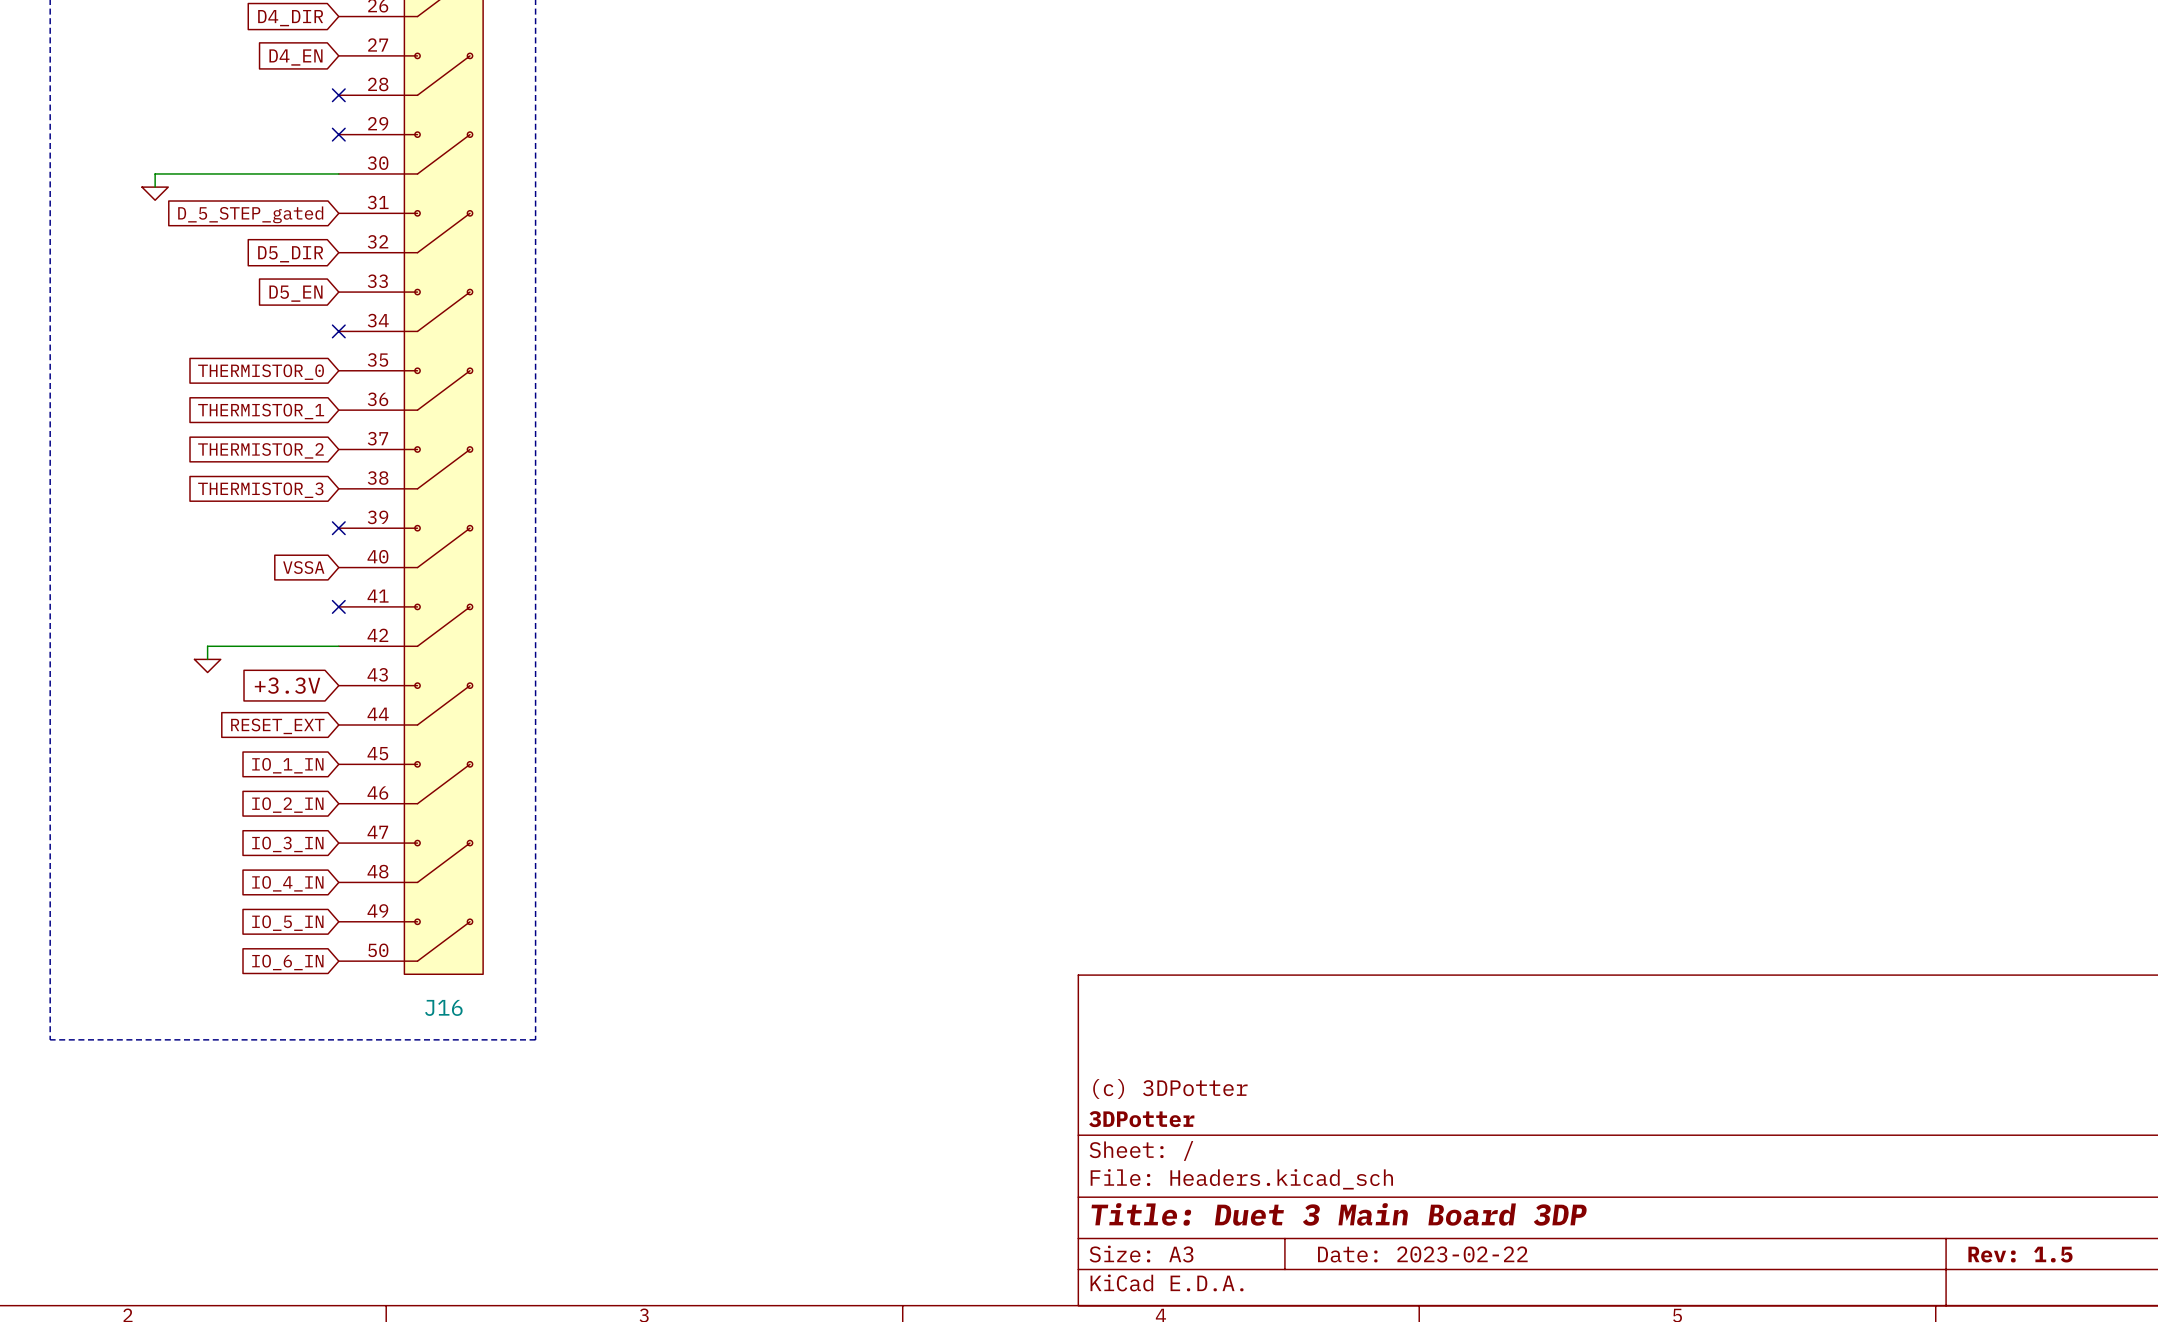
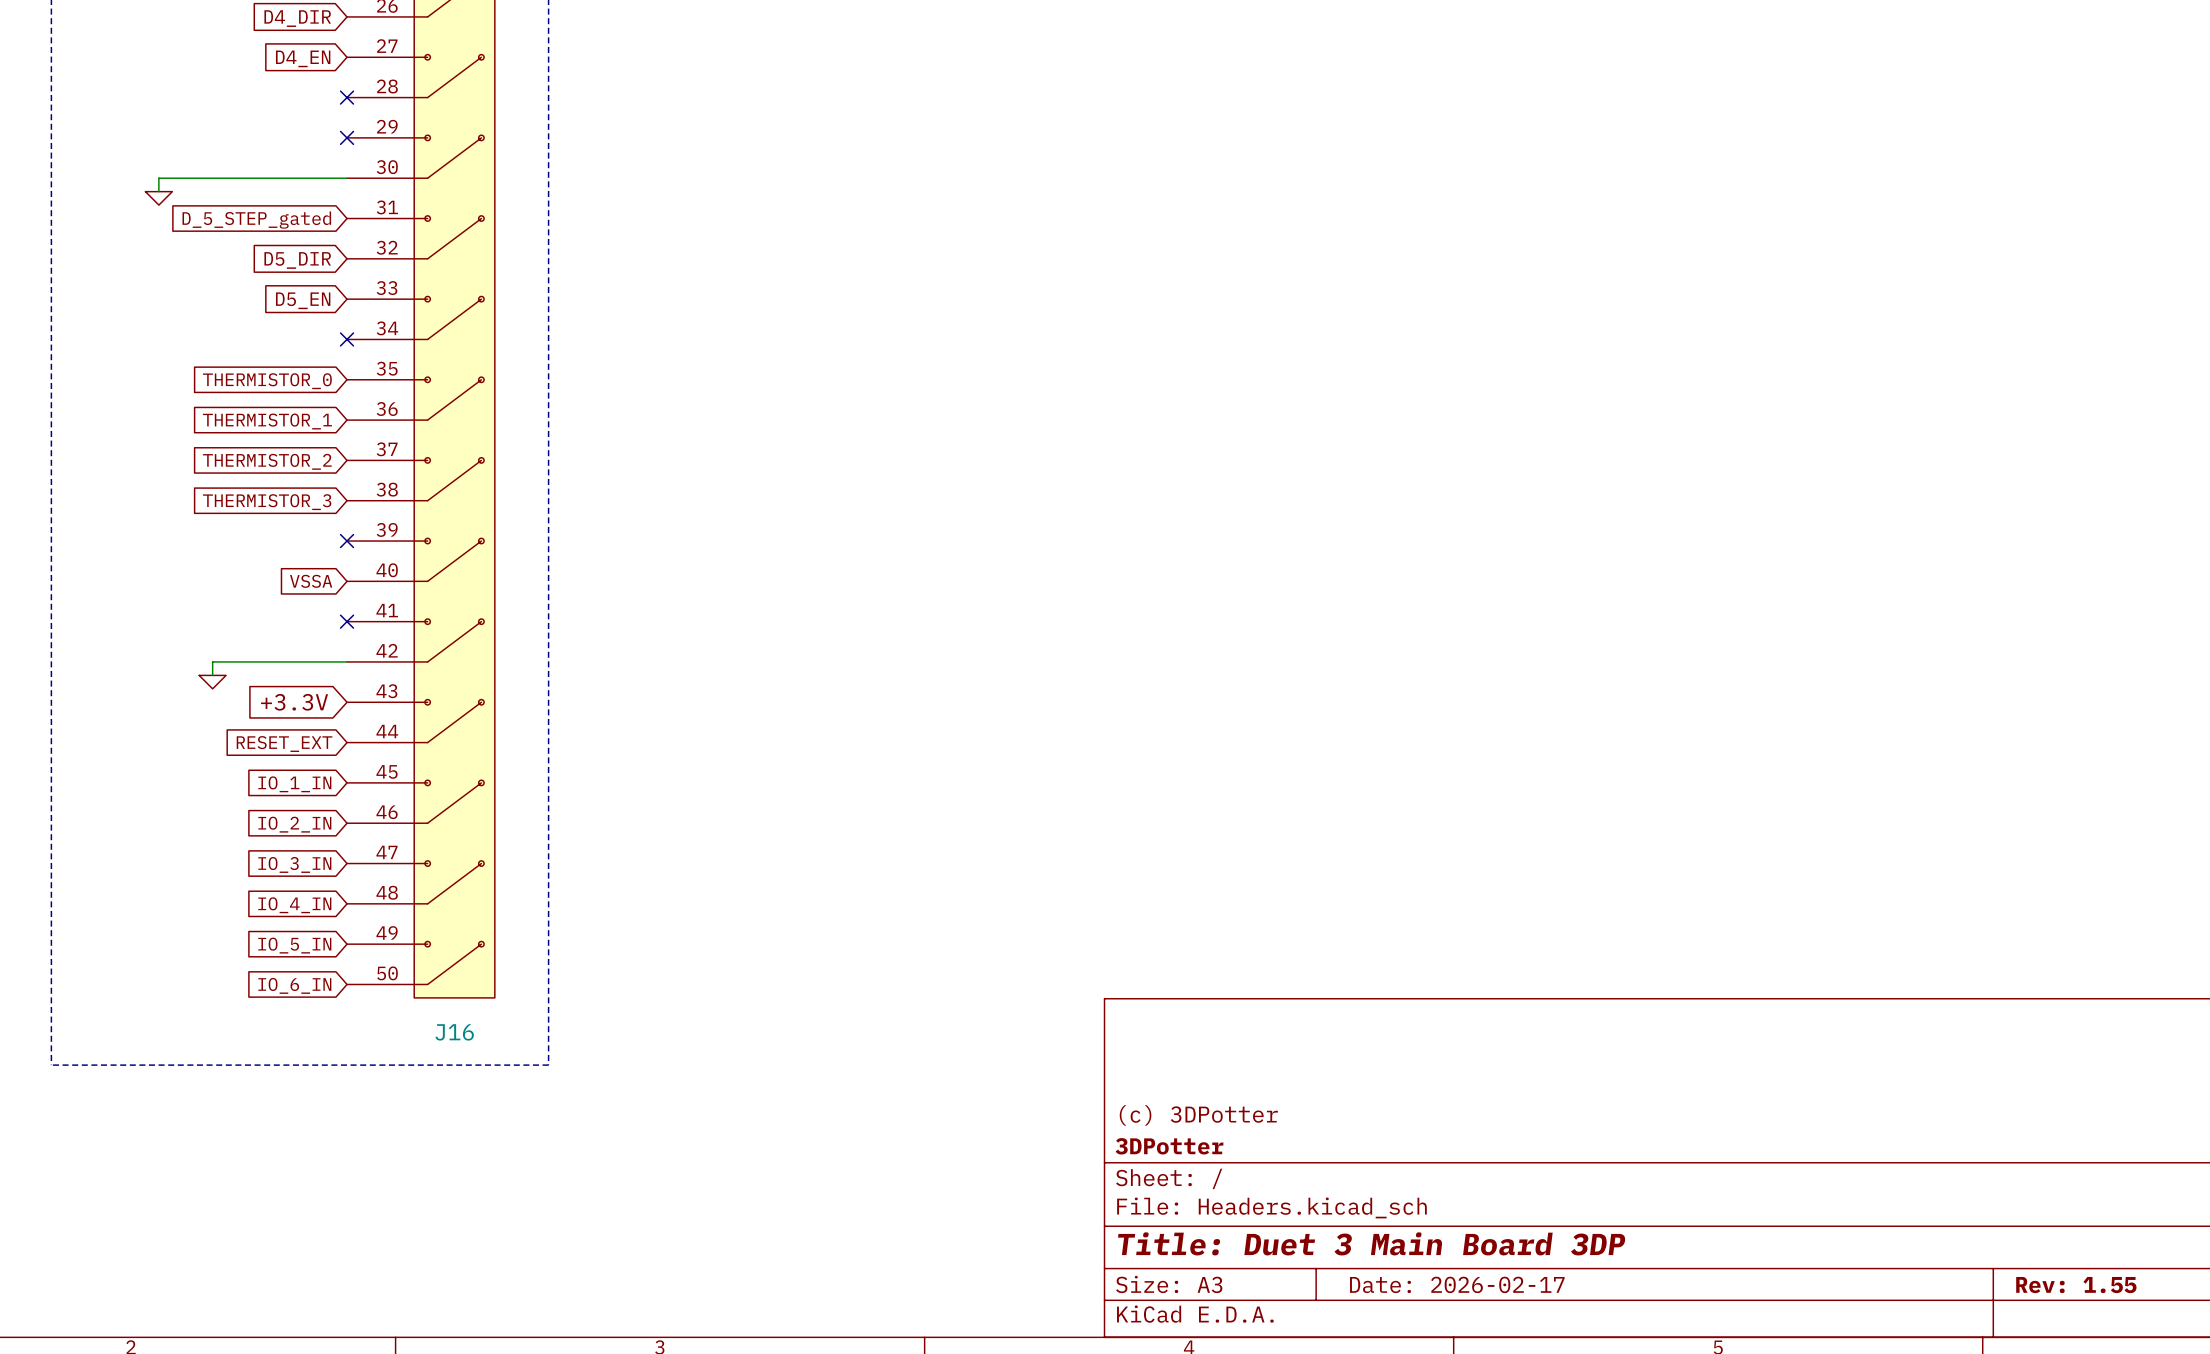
title block: Date: 2023-02-22 (1422, 1254) -> Date: 2026-02-17 (1457, 1284)
title block: Rev: 1.5 (2020, 1254) -> Rev: 1.55 (2076, 1285)

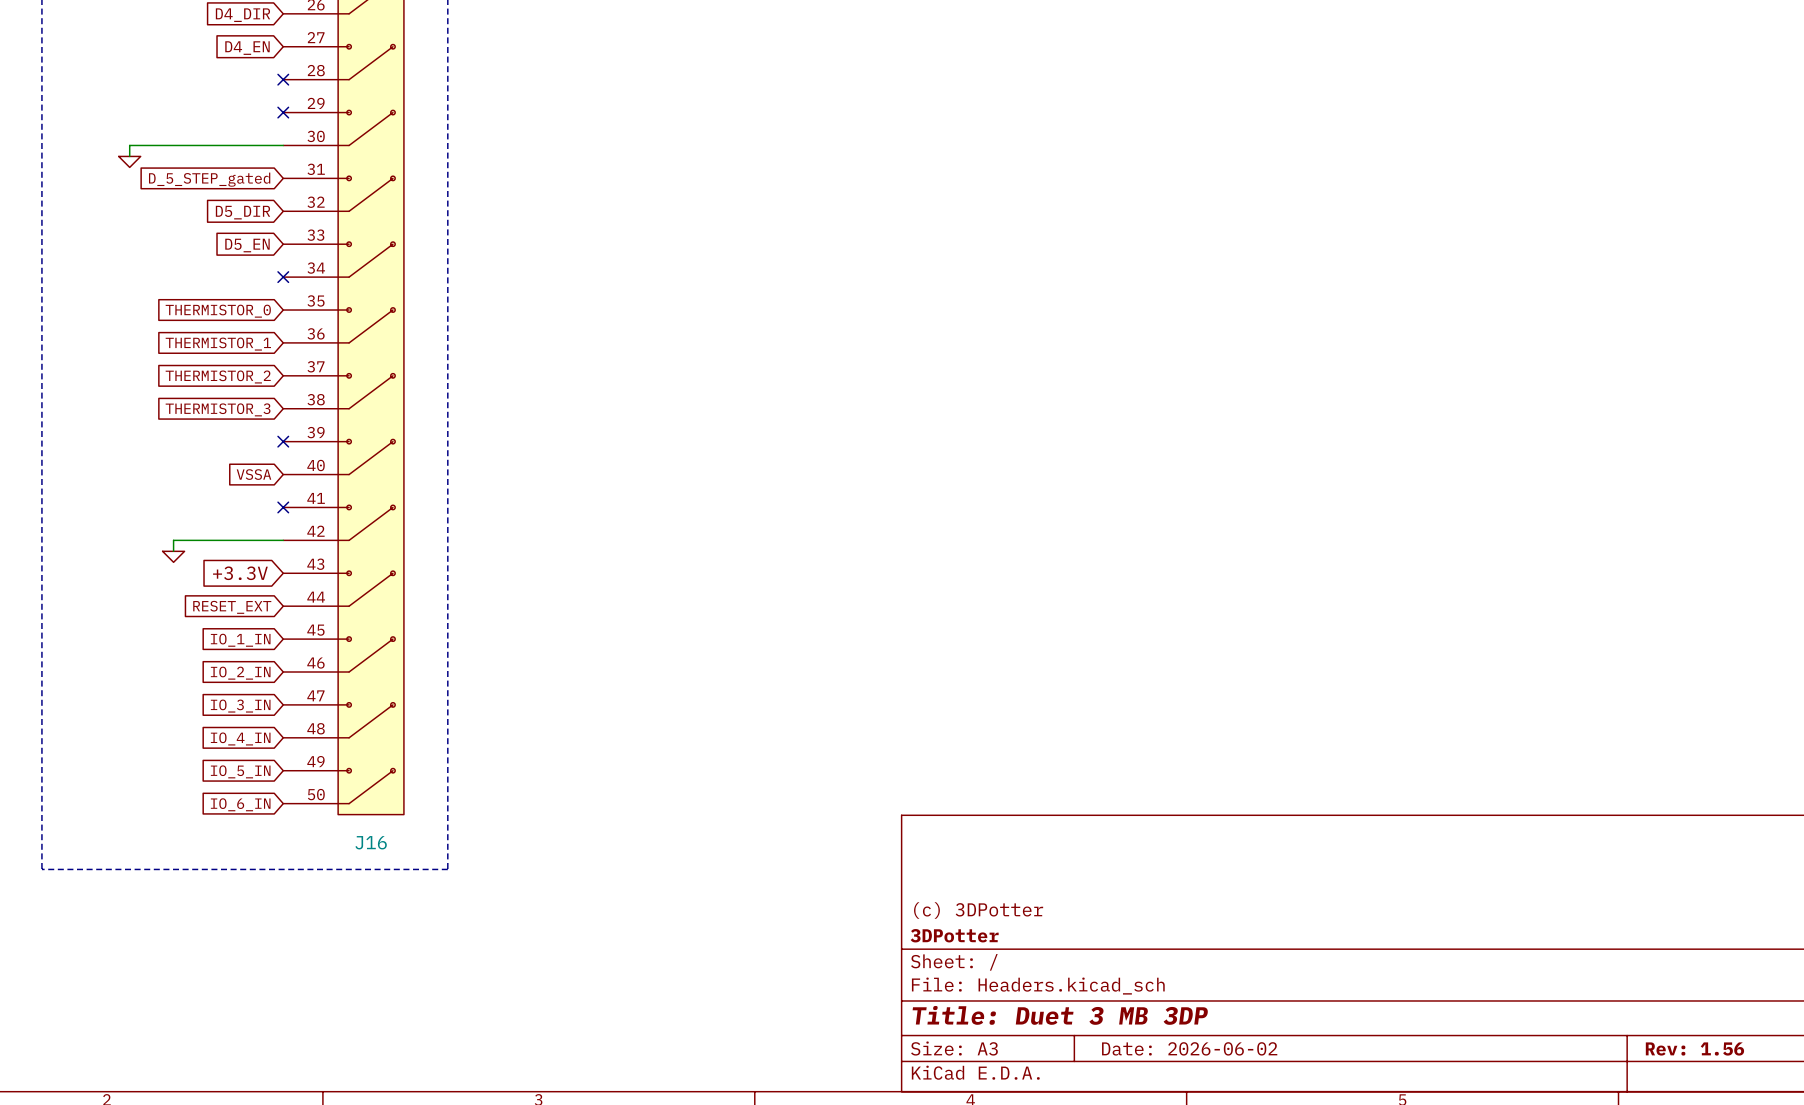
title block: Title: Duet 3 Main Board 3DP (1371, 1243) -> Title: Duet 3 MB 3DP (1060, 1015)
title block: Date: 2026-02-17 (1457, 1284) -> Date: 2026-06-02 (1189, 1048)
title block: Rev: 1.55 (2076, 1285) -> Rev: 1.56 (1694, 1048)

